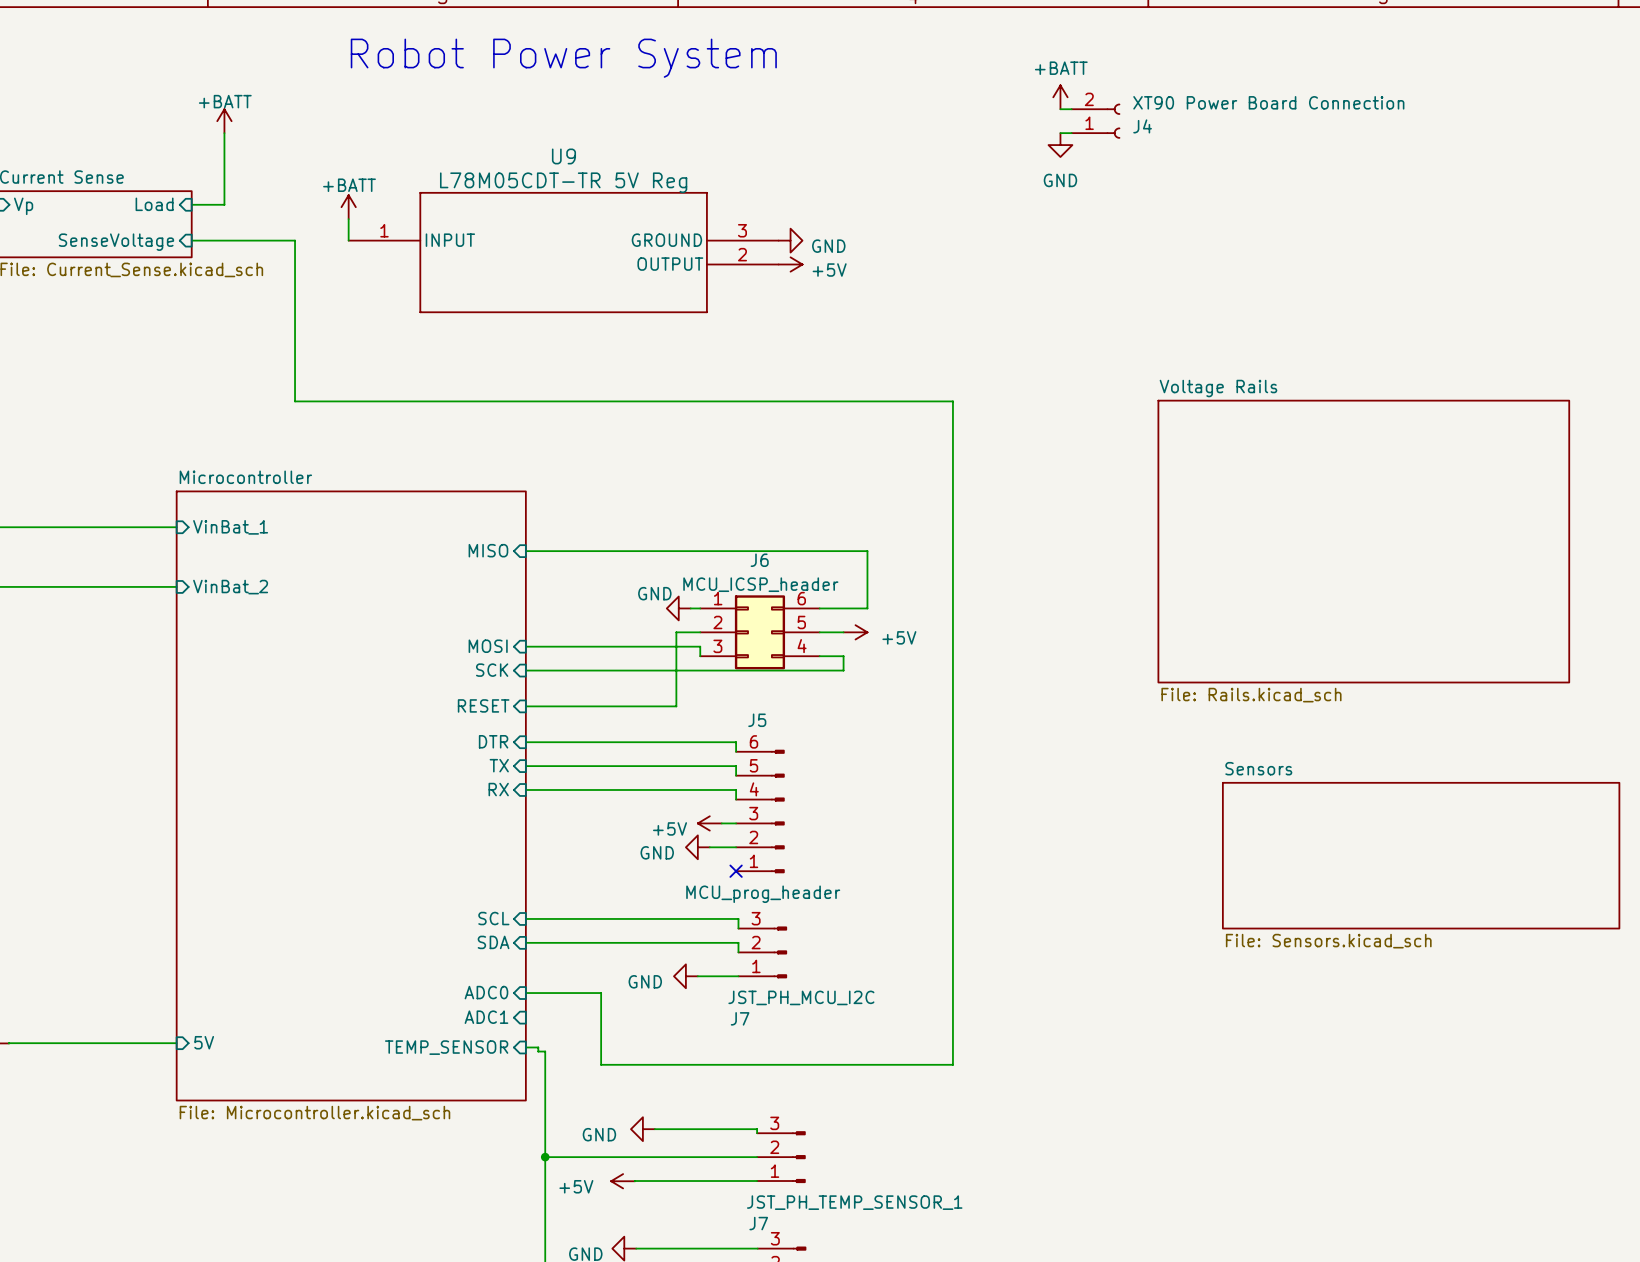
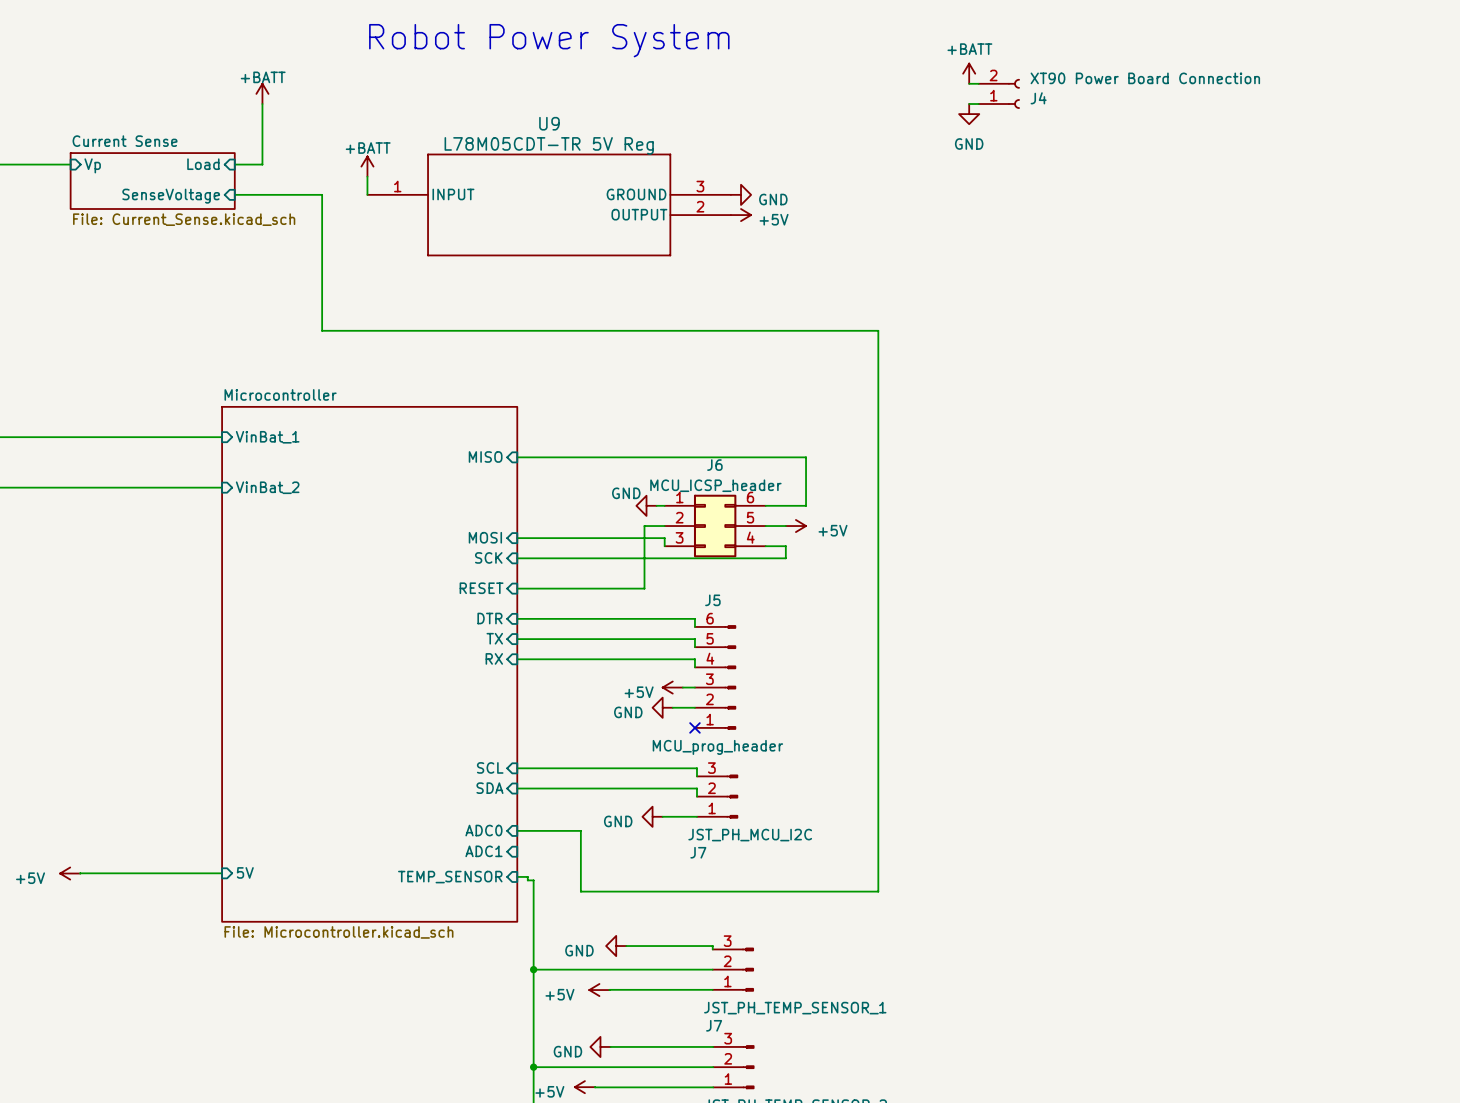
sheet Voltage Rails: File: Rails.kicad_sch (1363, 541) -> none
sheet Sensors: File: Sensors.kicad_sch (1421, 855) -> none

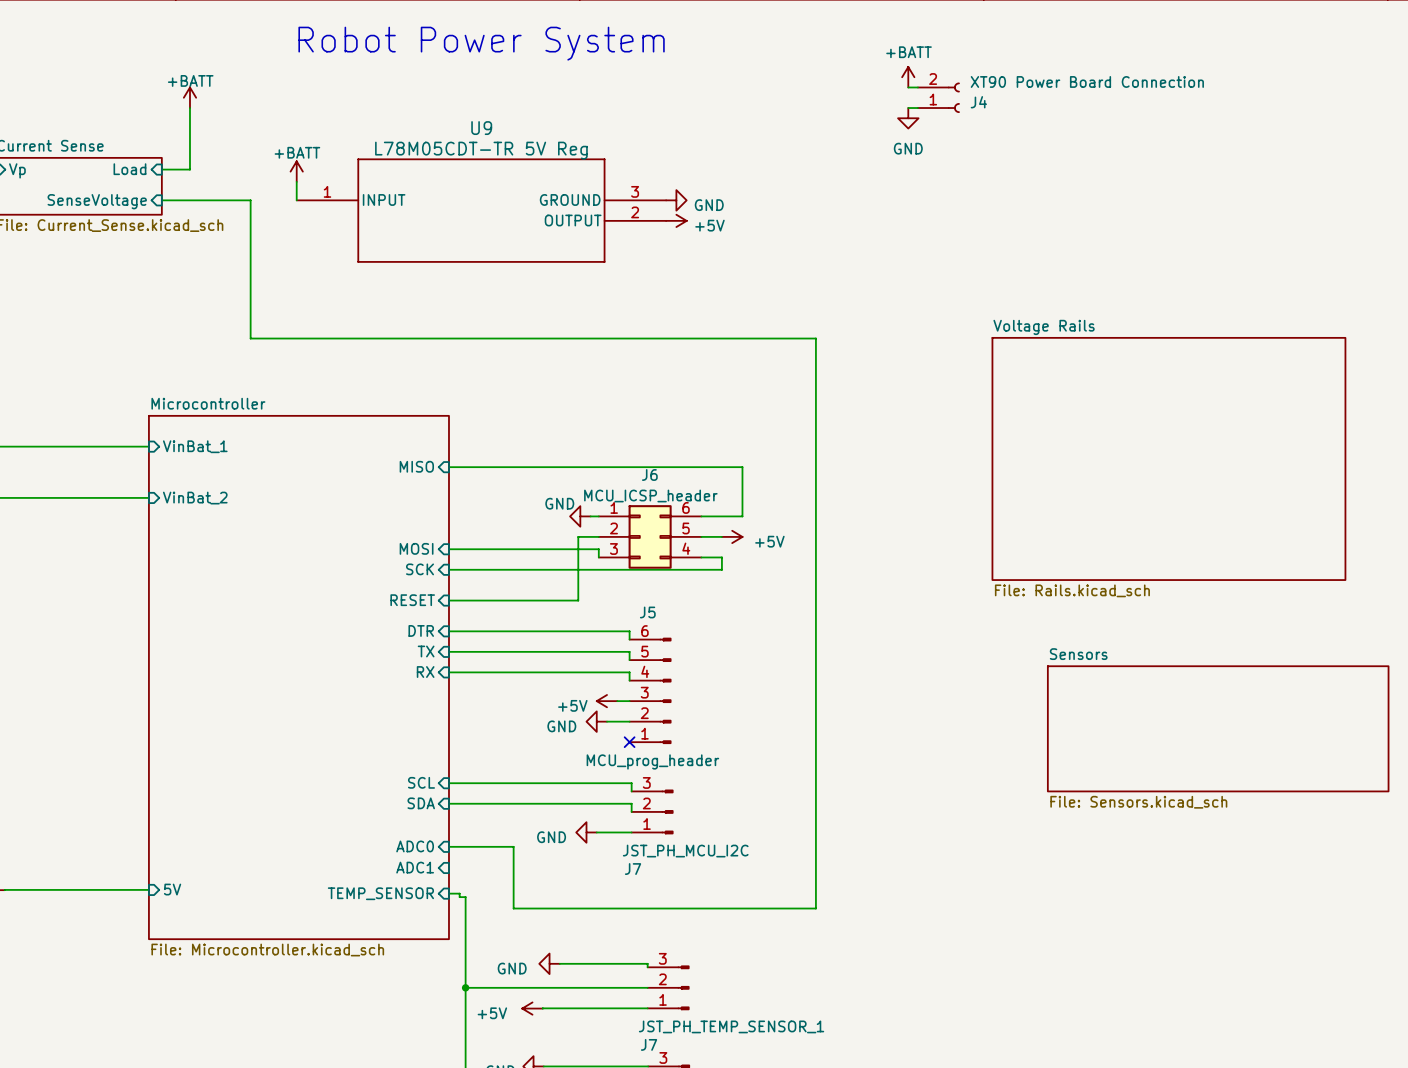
sheet Voltage Rails: none -> File: Rails.kicad_sch (1168, 458)
sheet Sensors: none -> File: Sensors.kicad_sch (1218, 728)

